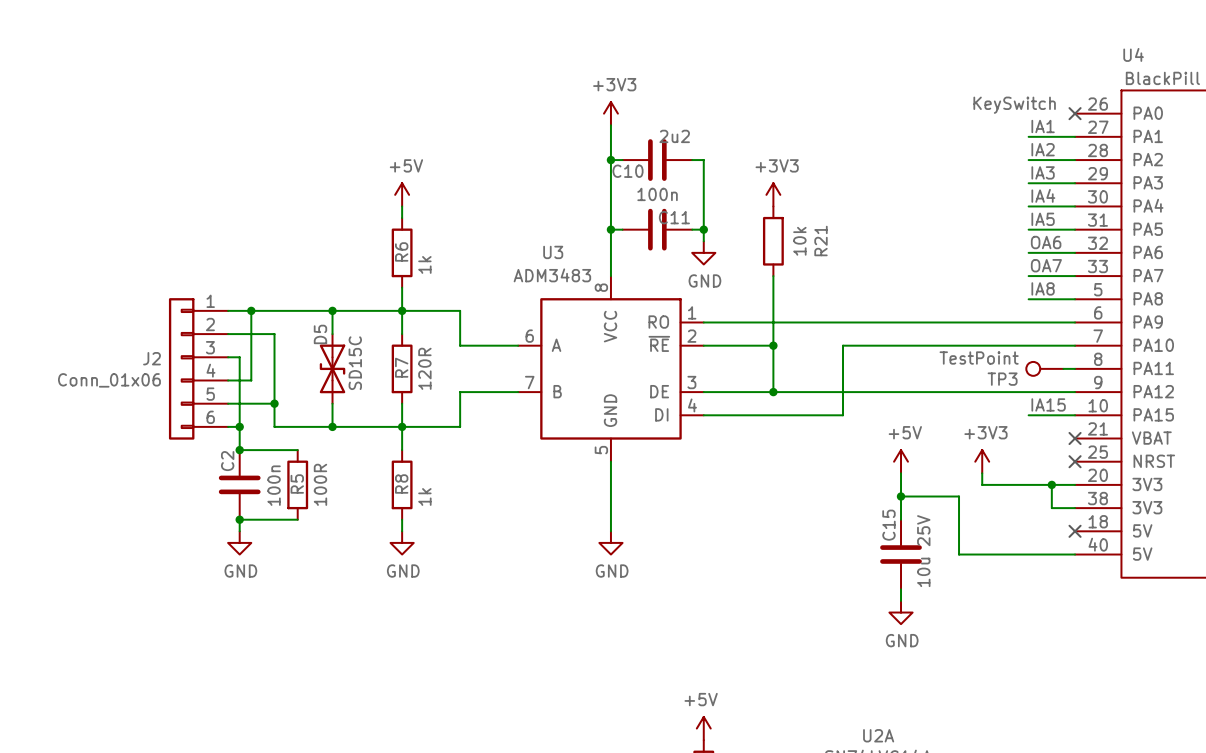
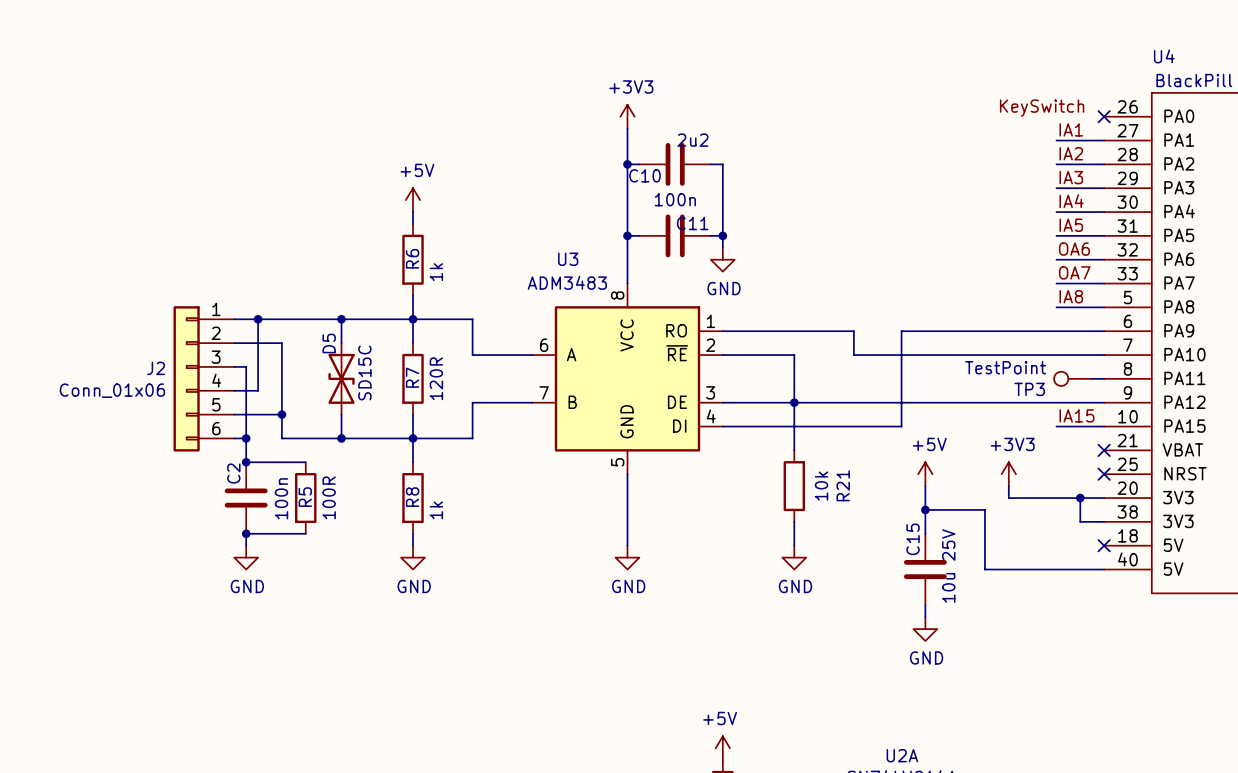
power symbol: +3V3 (773, 194) -> none
R21 position: (773, 241) -> (794, 486)
wire: (773, 276) (773, 345) -> none
wire: (831, 322) (877, 322) -> (853, 331) (853, 355) (865, 355)
junction: (773, 345) -> none
wire: (843, 345) (843, 415) -> (901, 331) (901, 426) (865, 426)
wire: none -> (794, 402) (794, 450)
wire: none -> (794, 521) (794, 545)
power symbol: none -> GND (794, 557)

